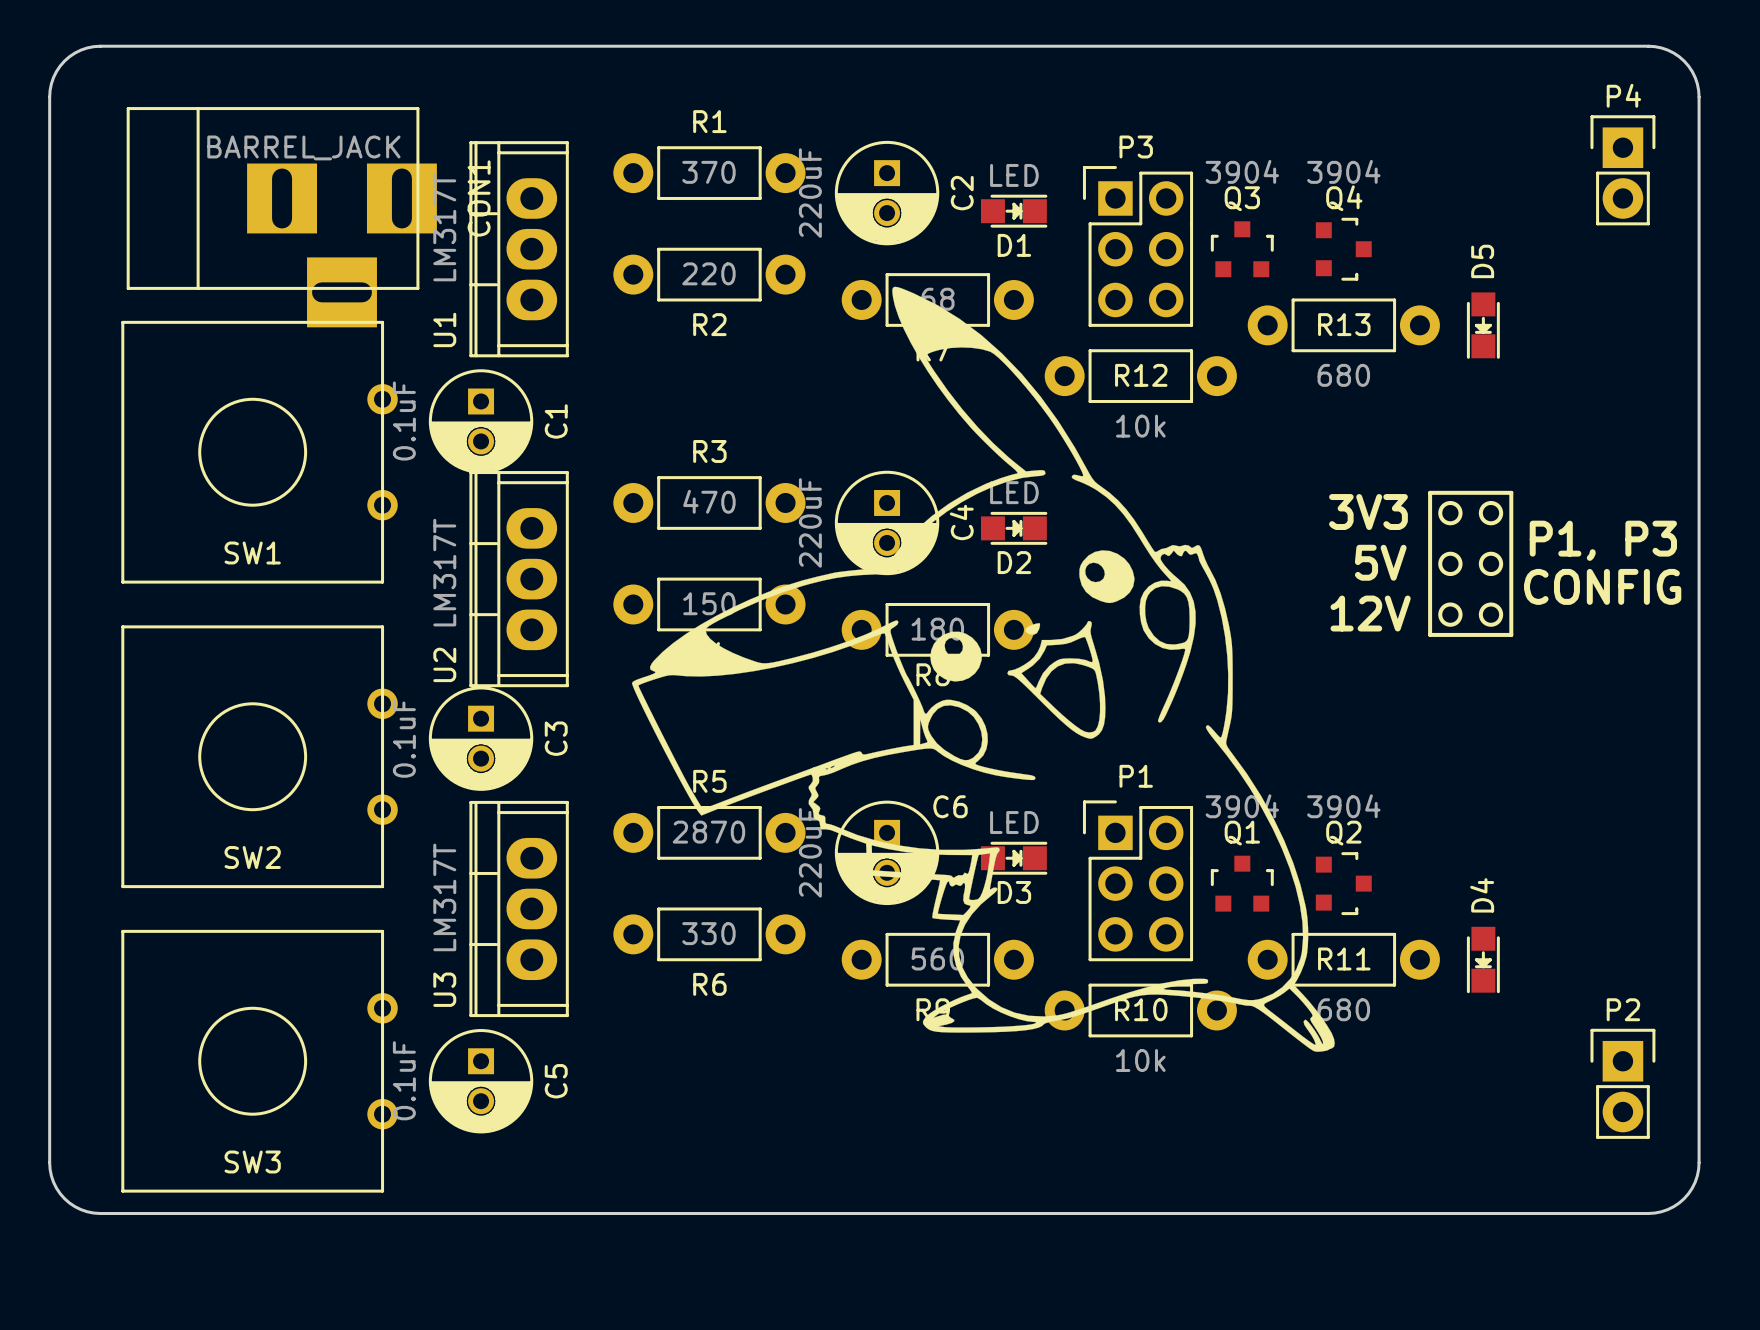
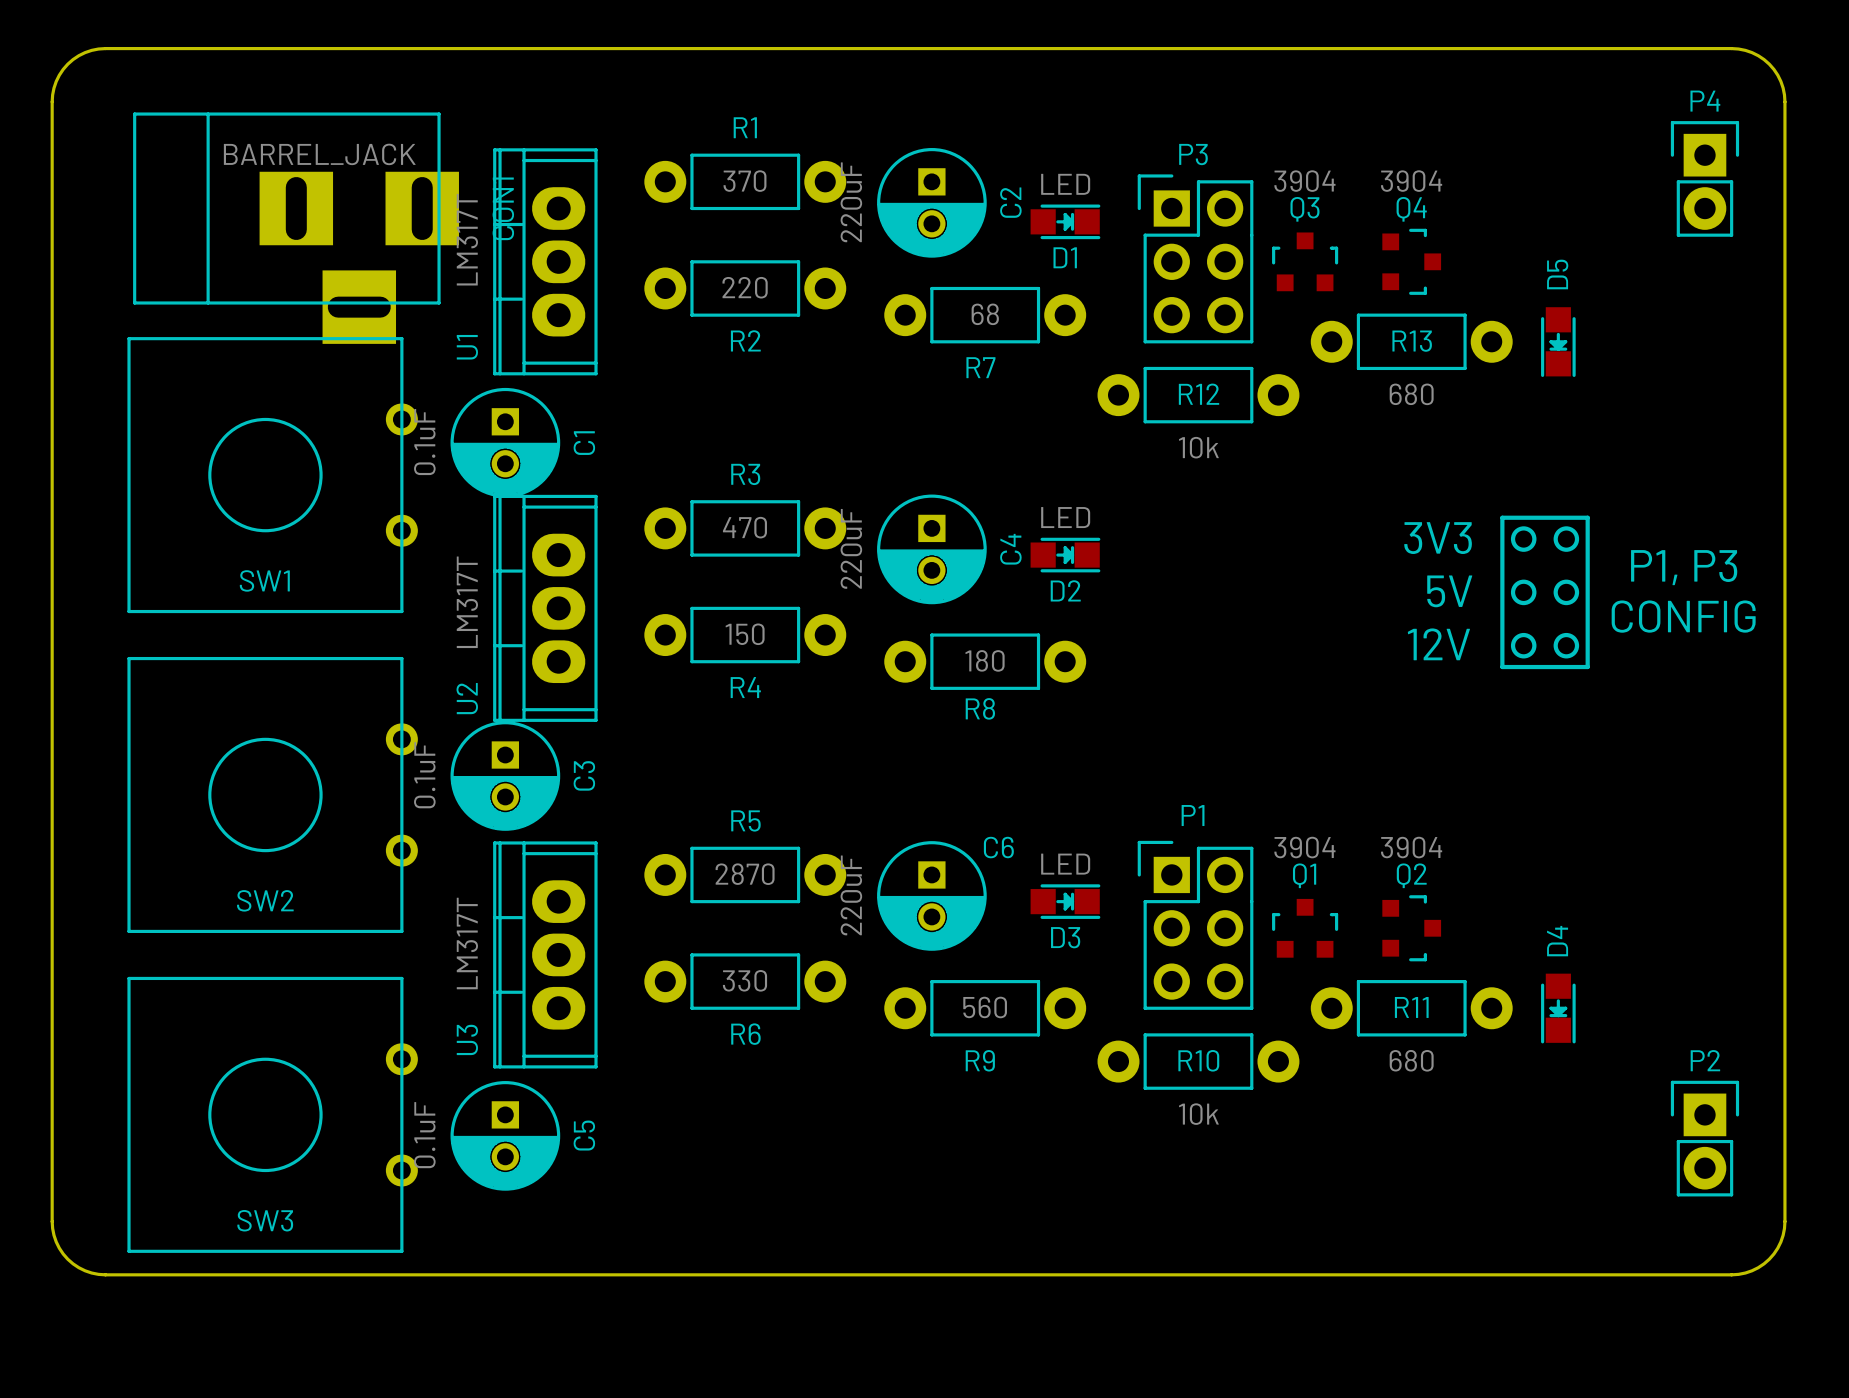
drawing: [631, 286, 1335, 1052] -> none

